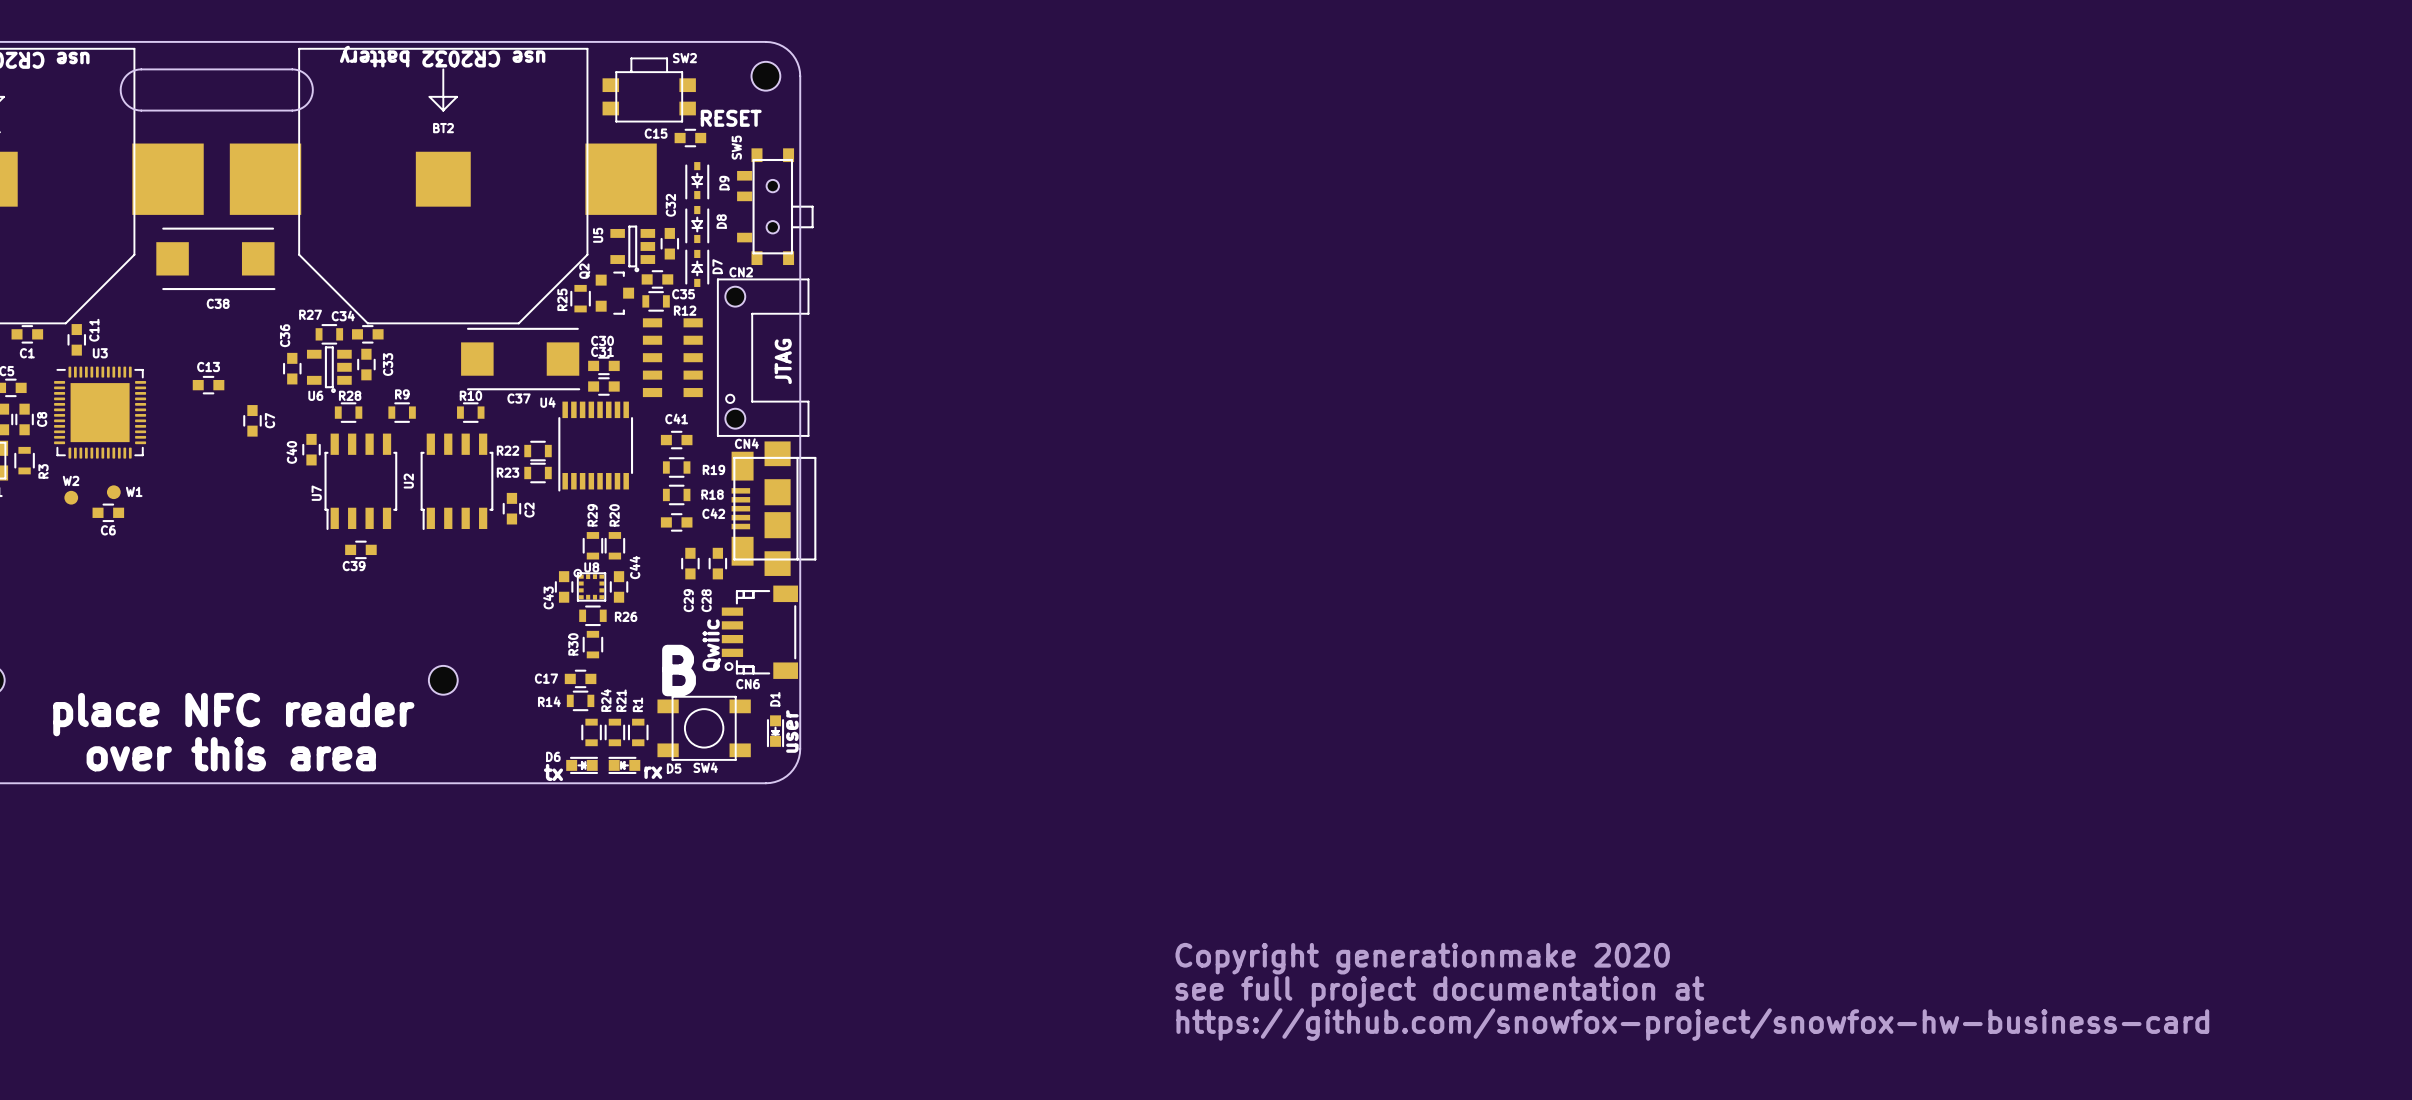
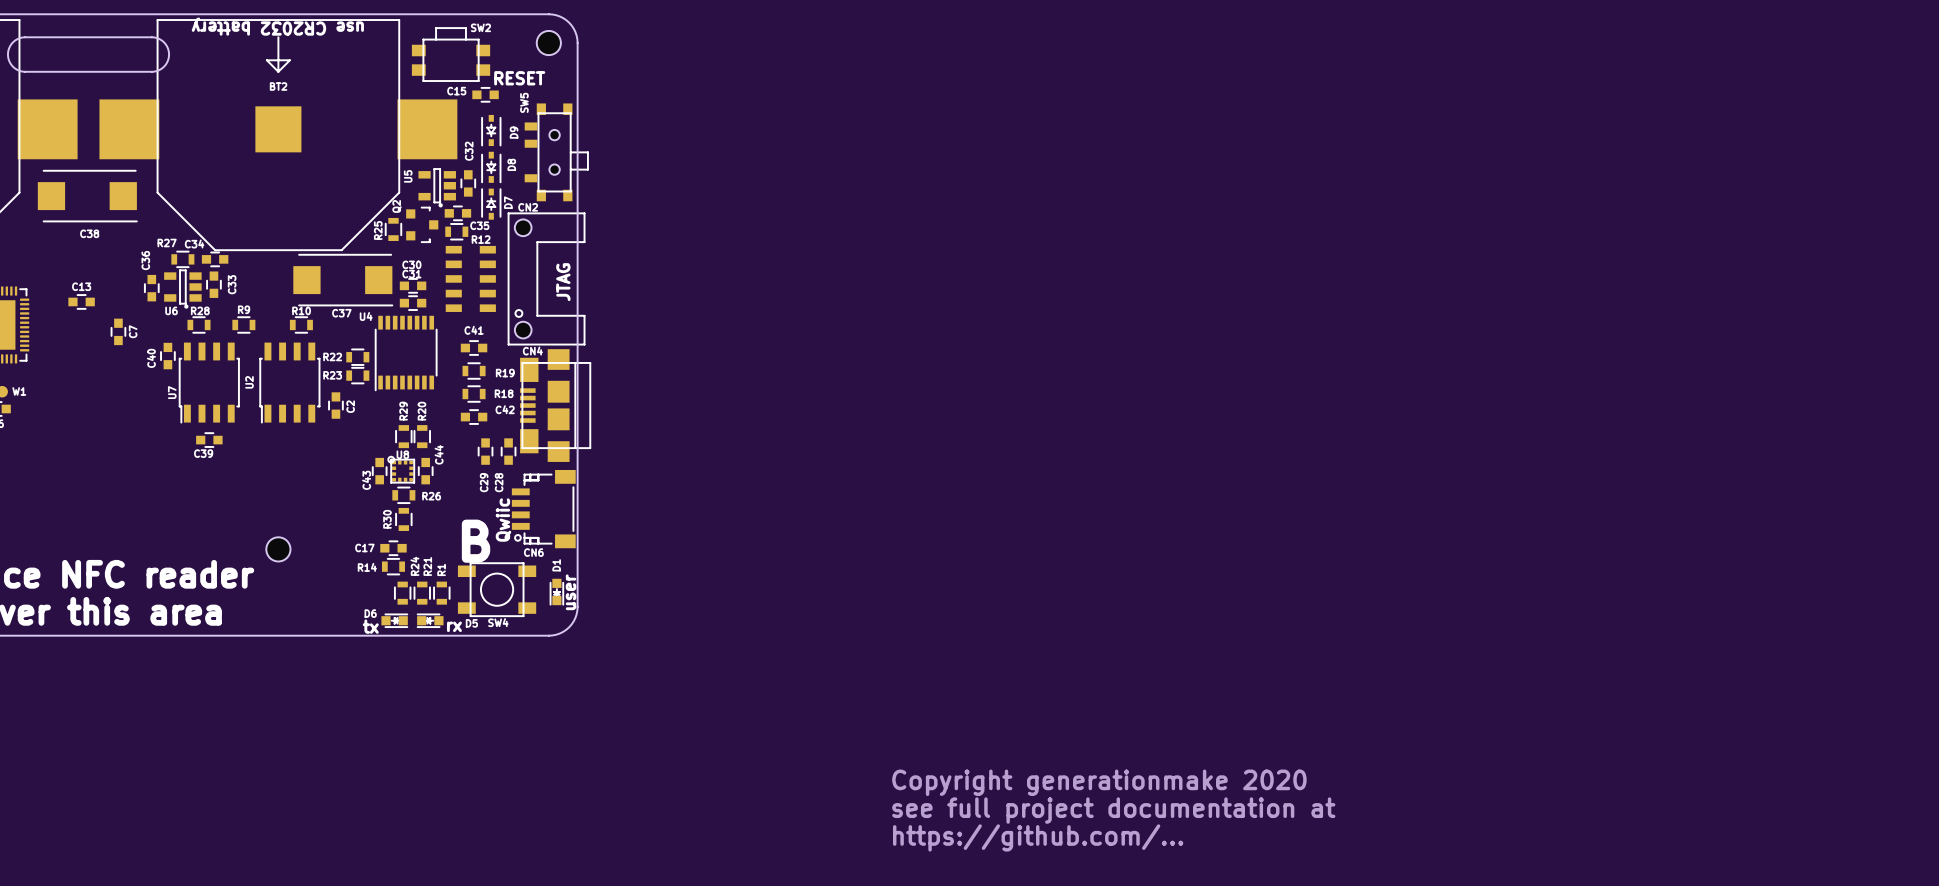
text: https://github.com/snowfox-project/snowfox-hw-business-card (1692, 1024) -> https://github.com/... (1038, 837)

